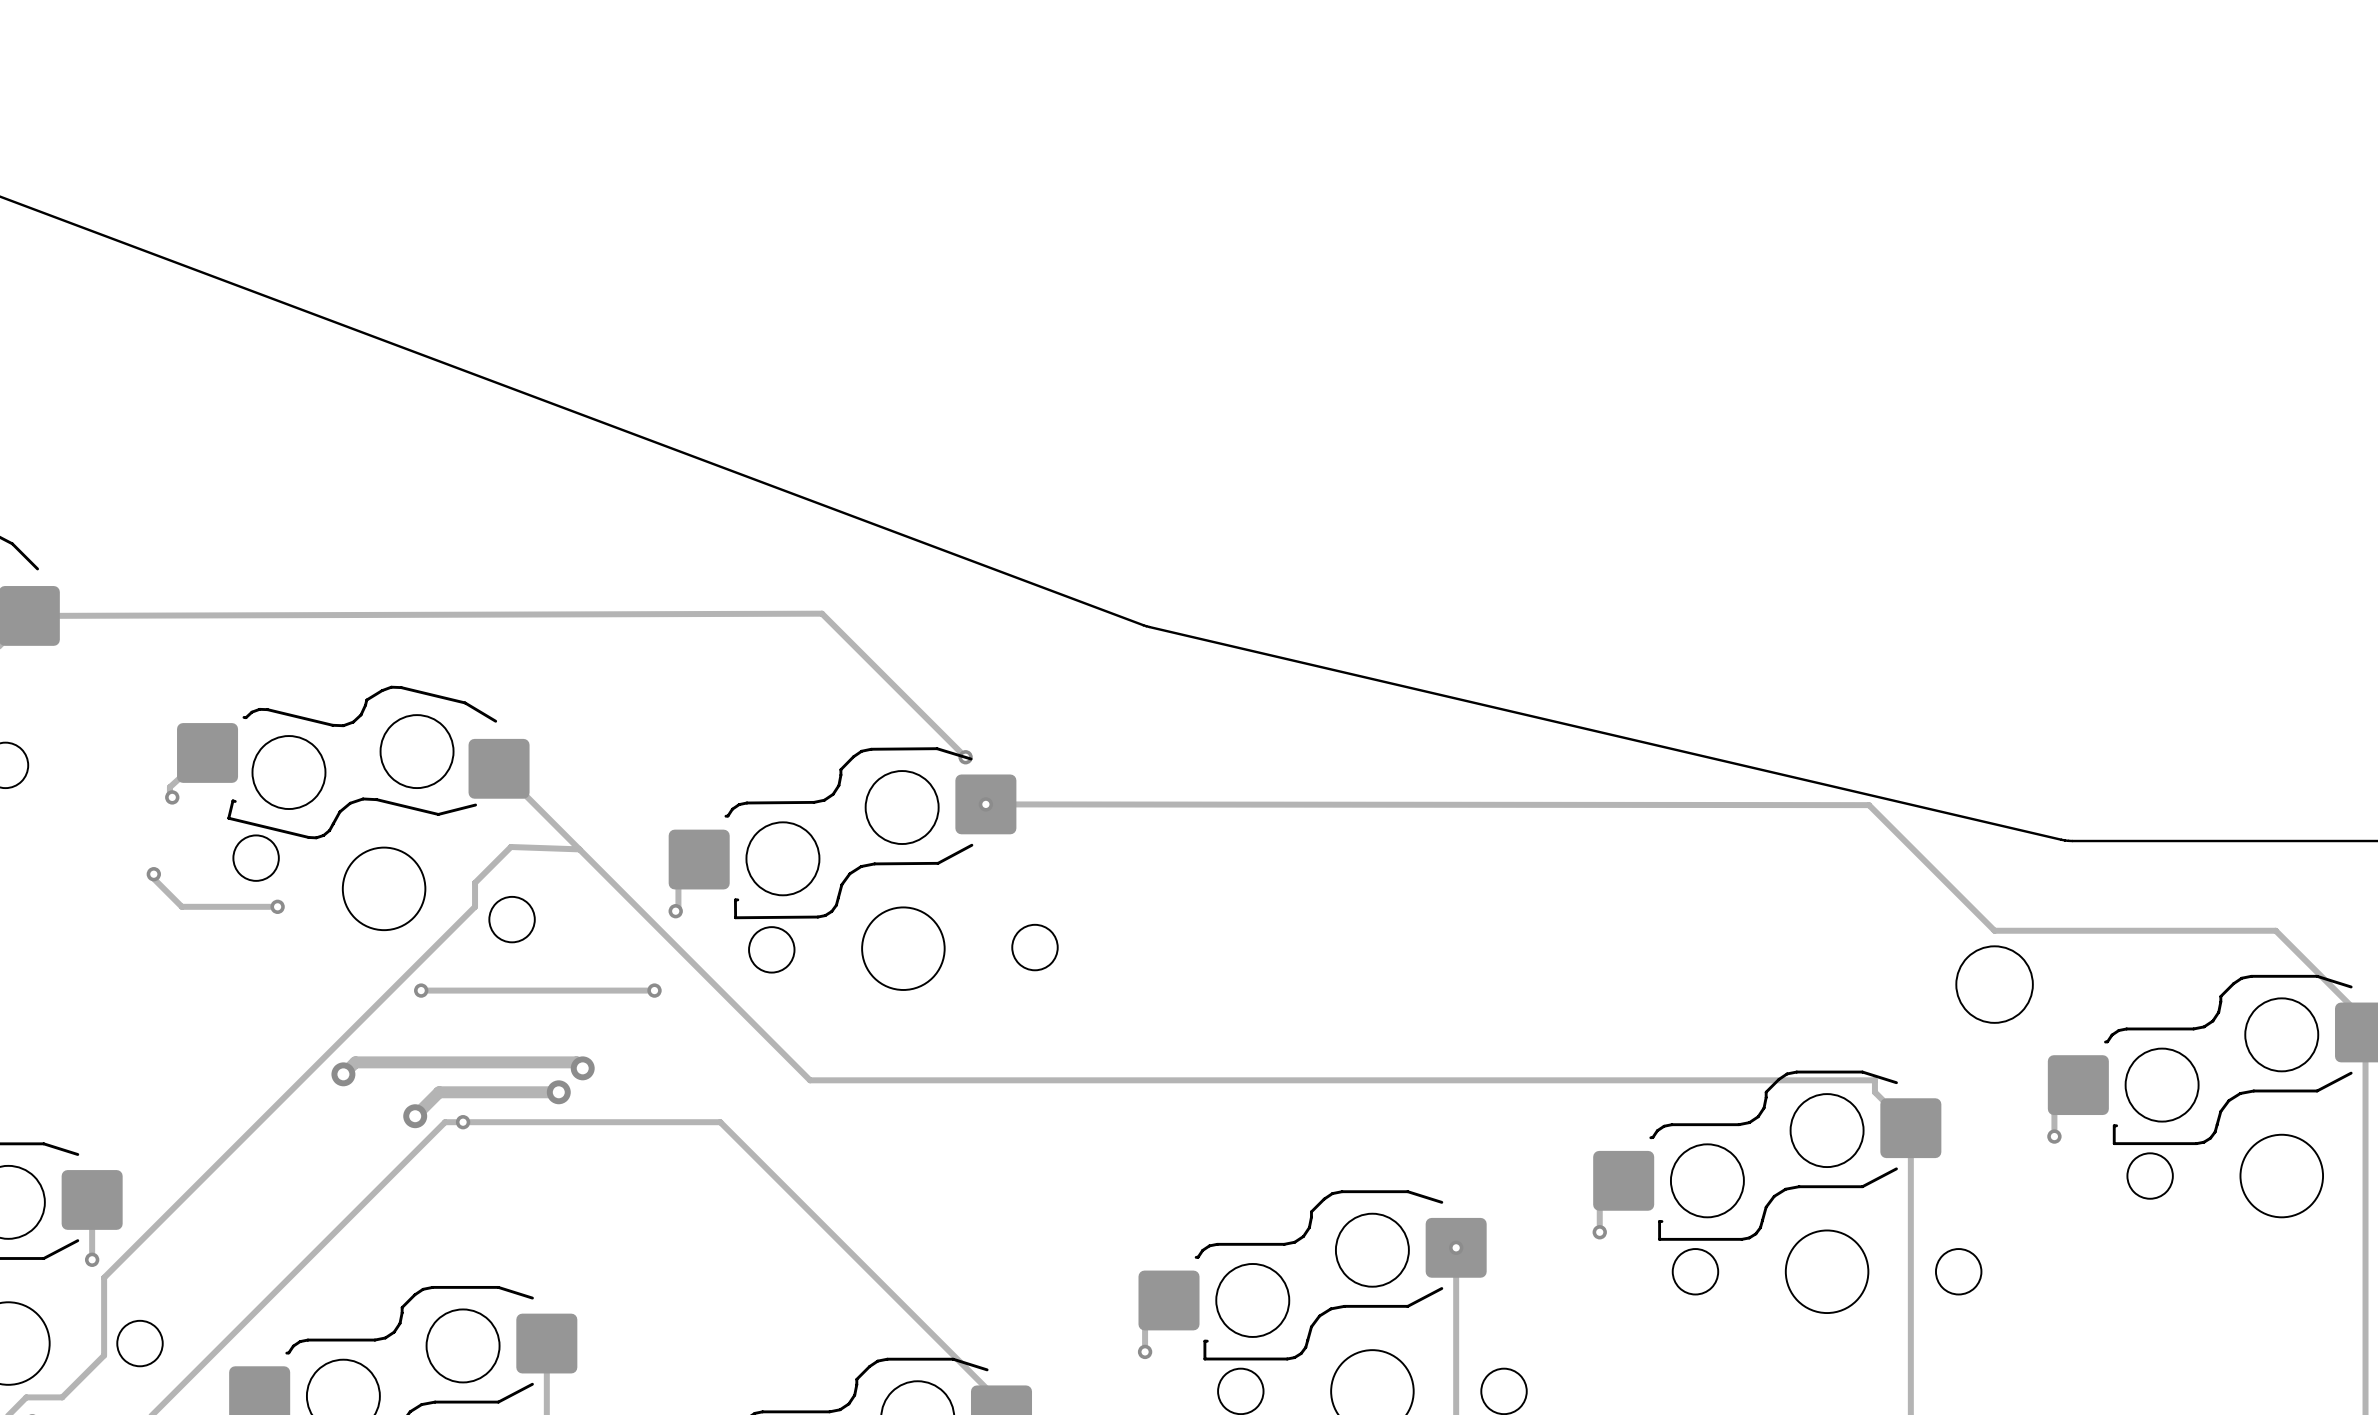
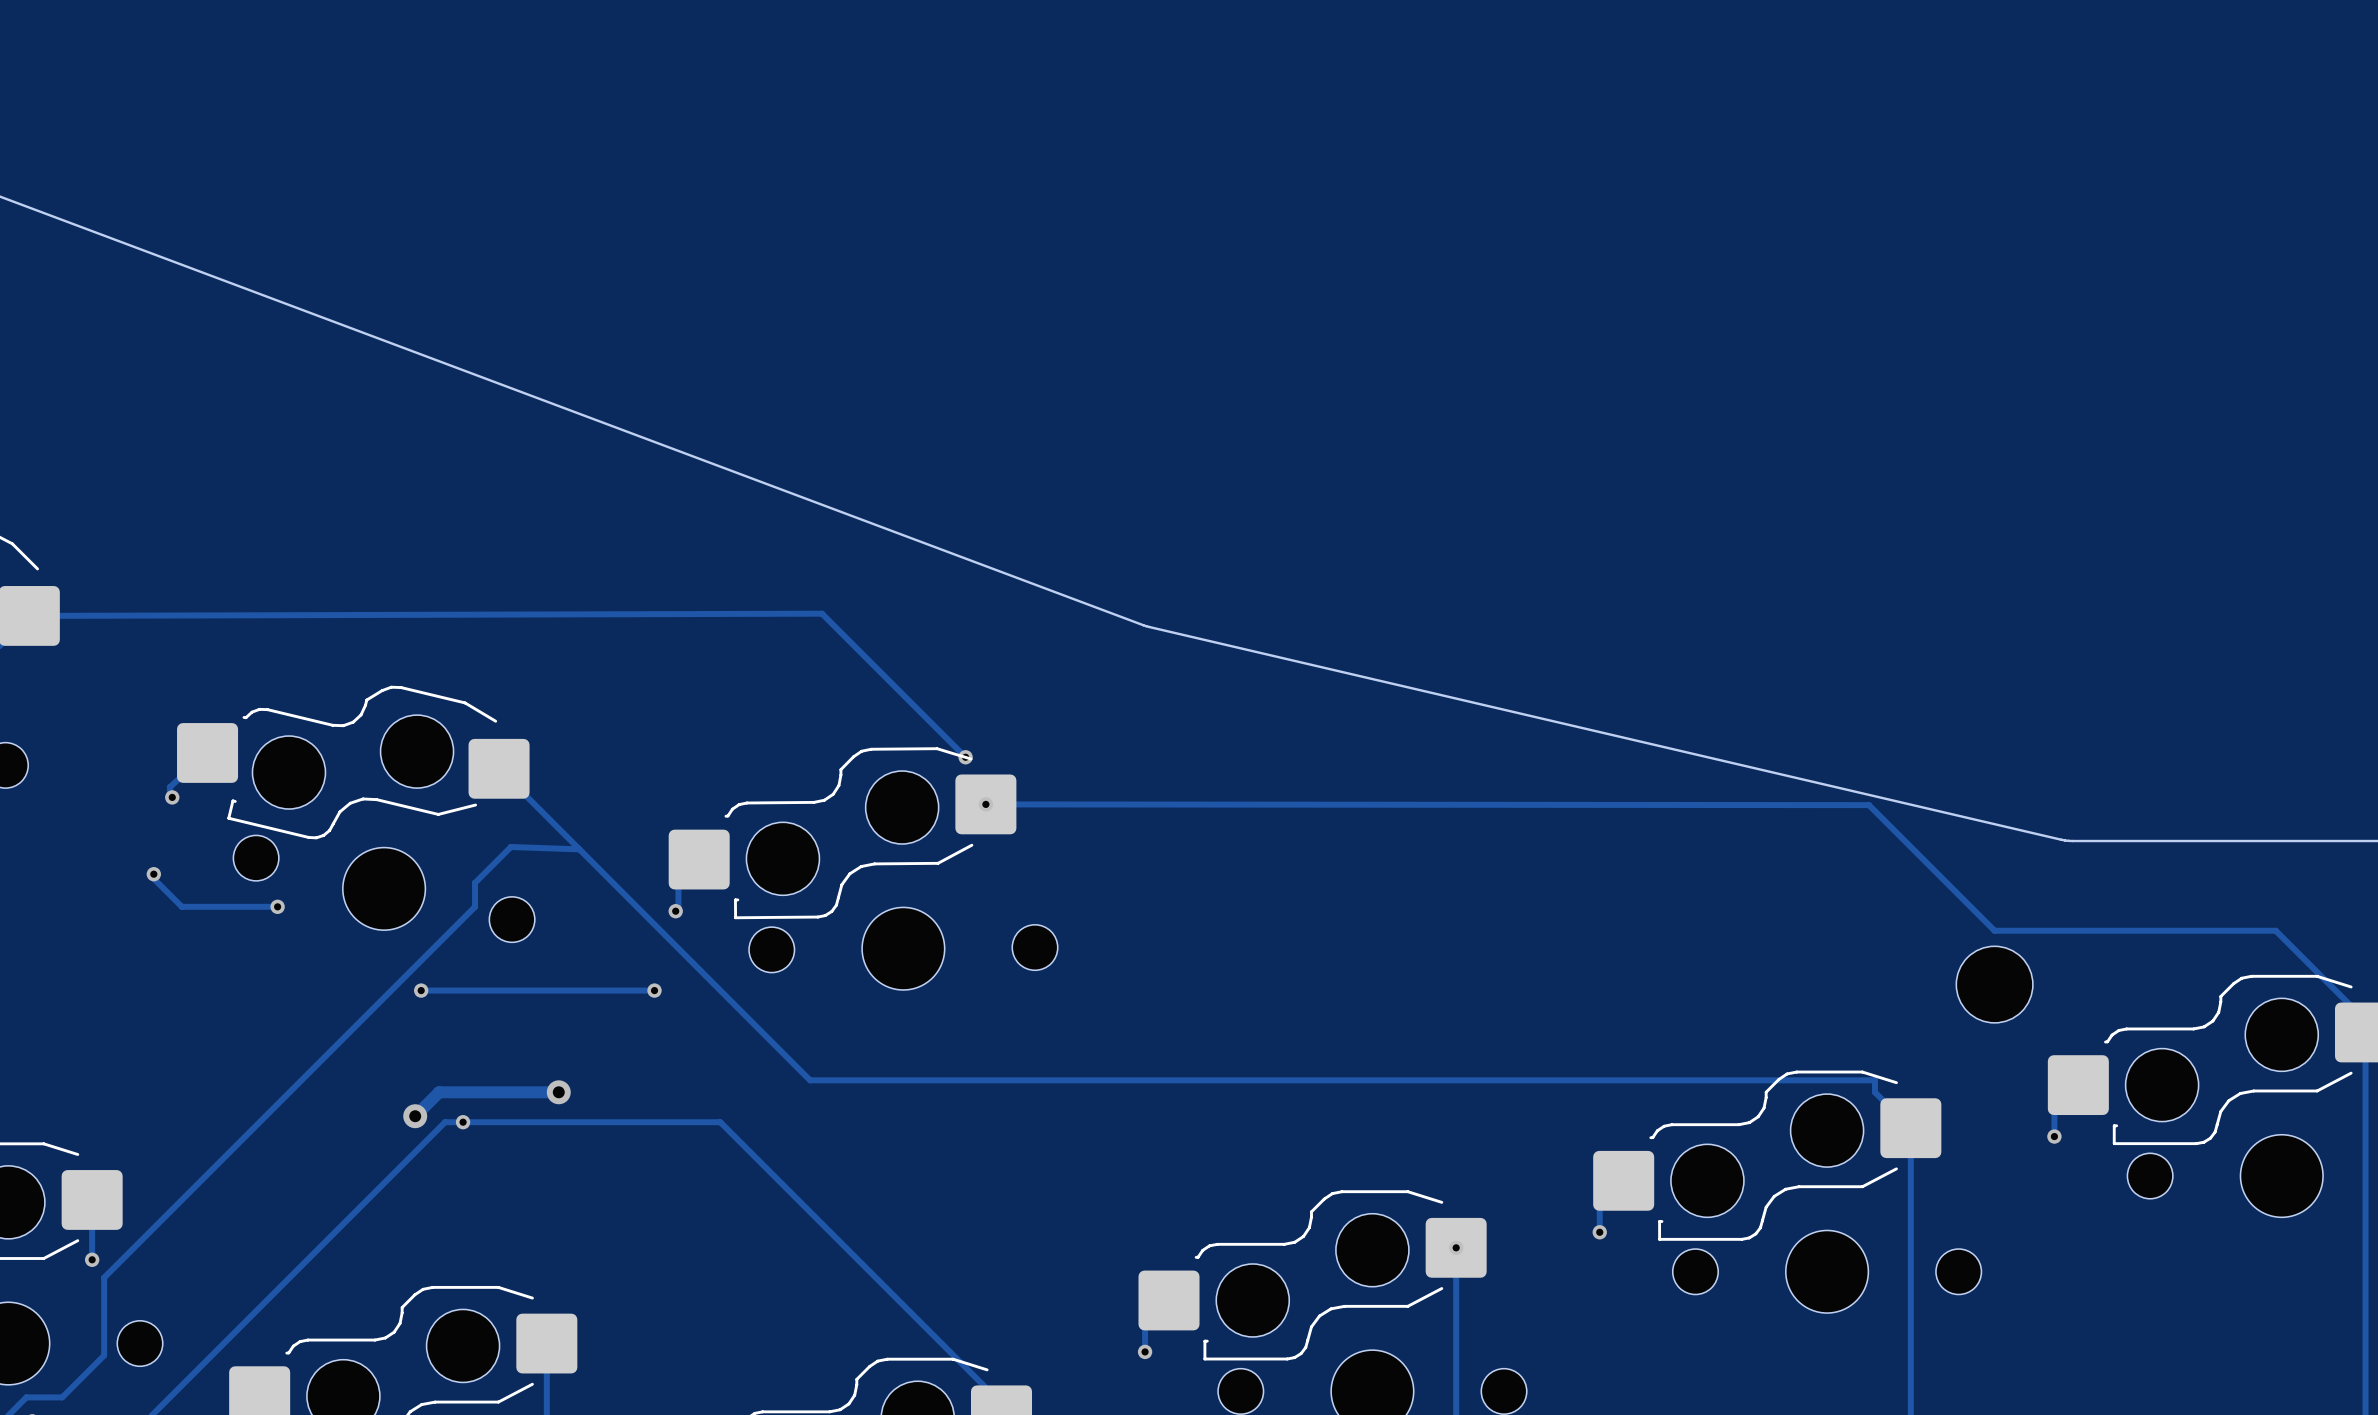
track: (582, 1068) (576, 1062) (355, 1062) (343, 1074) -> none
via: (582, 1068) -> none
via: (343, 1074) -> none

